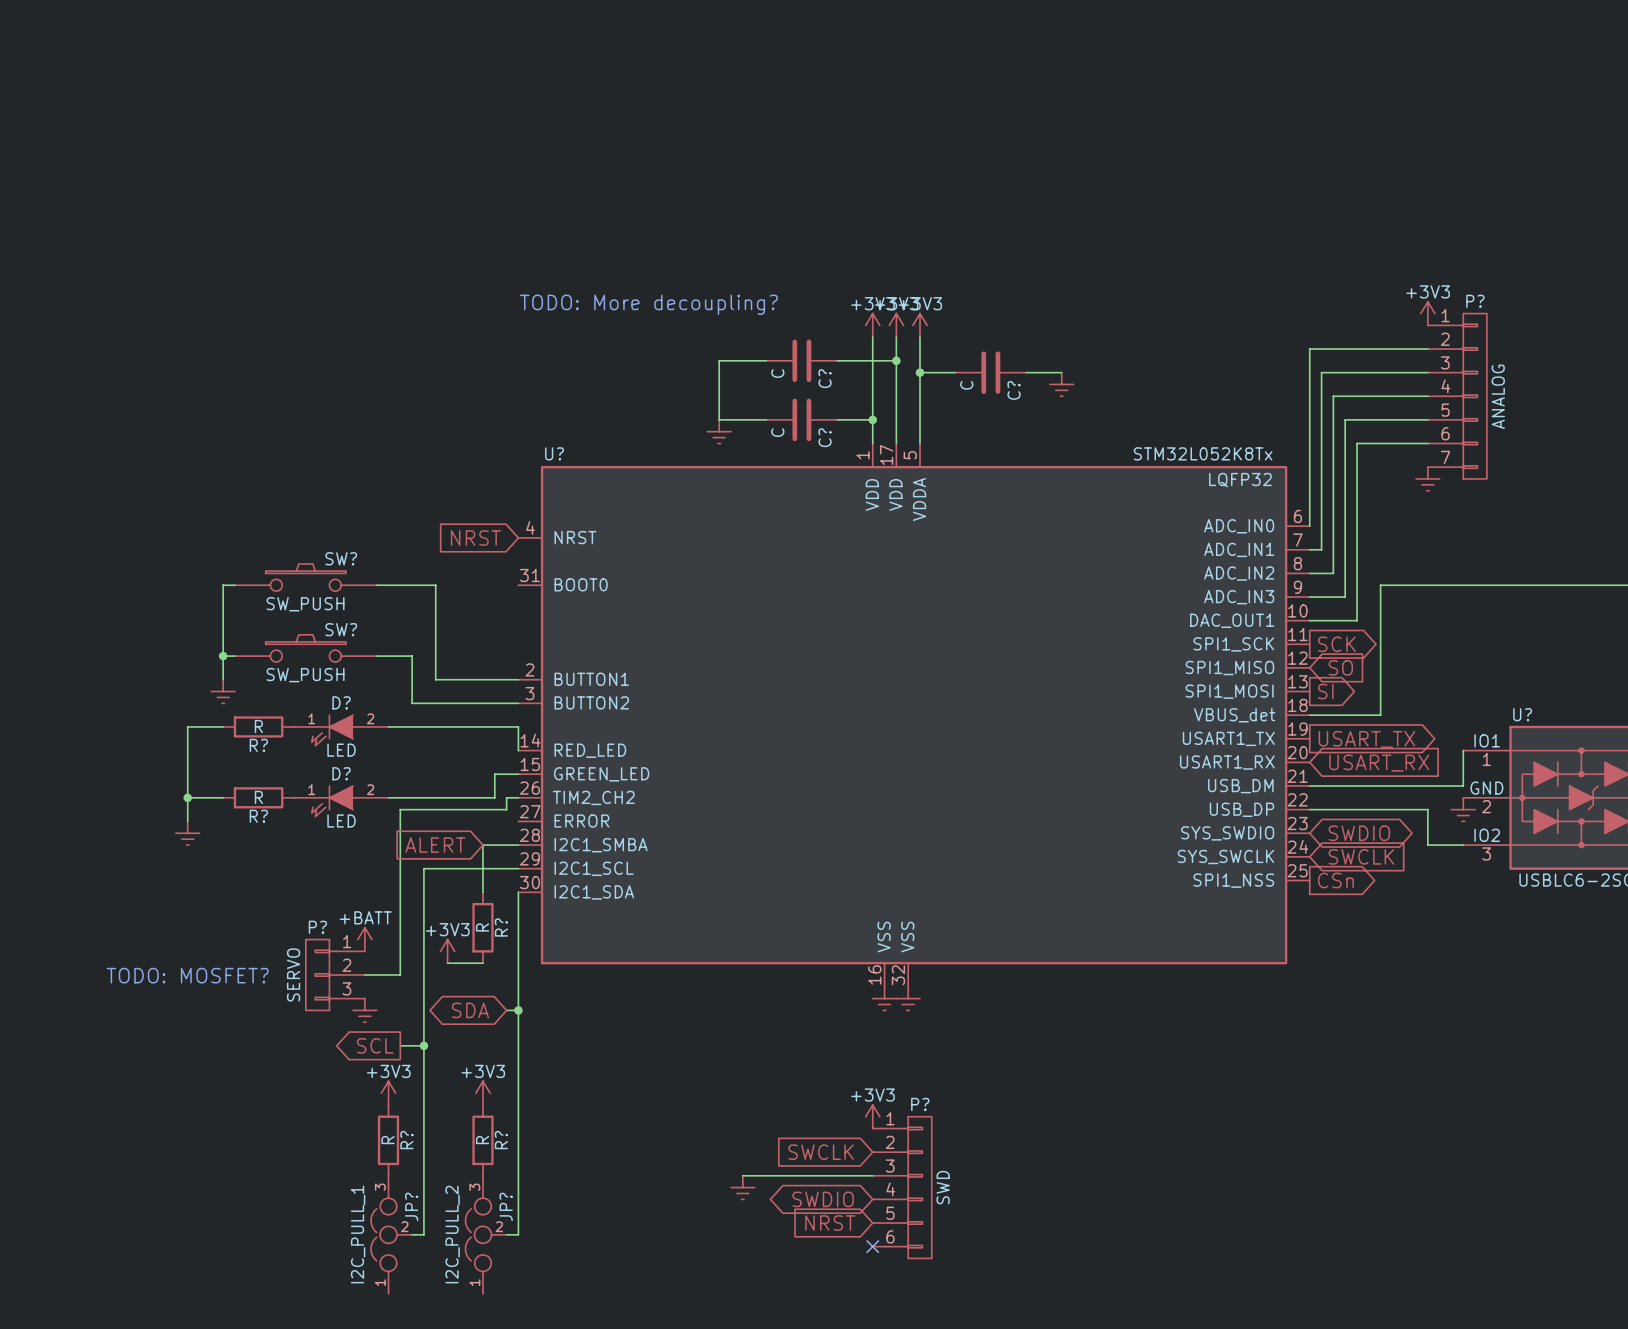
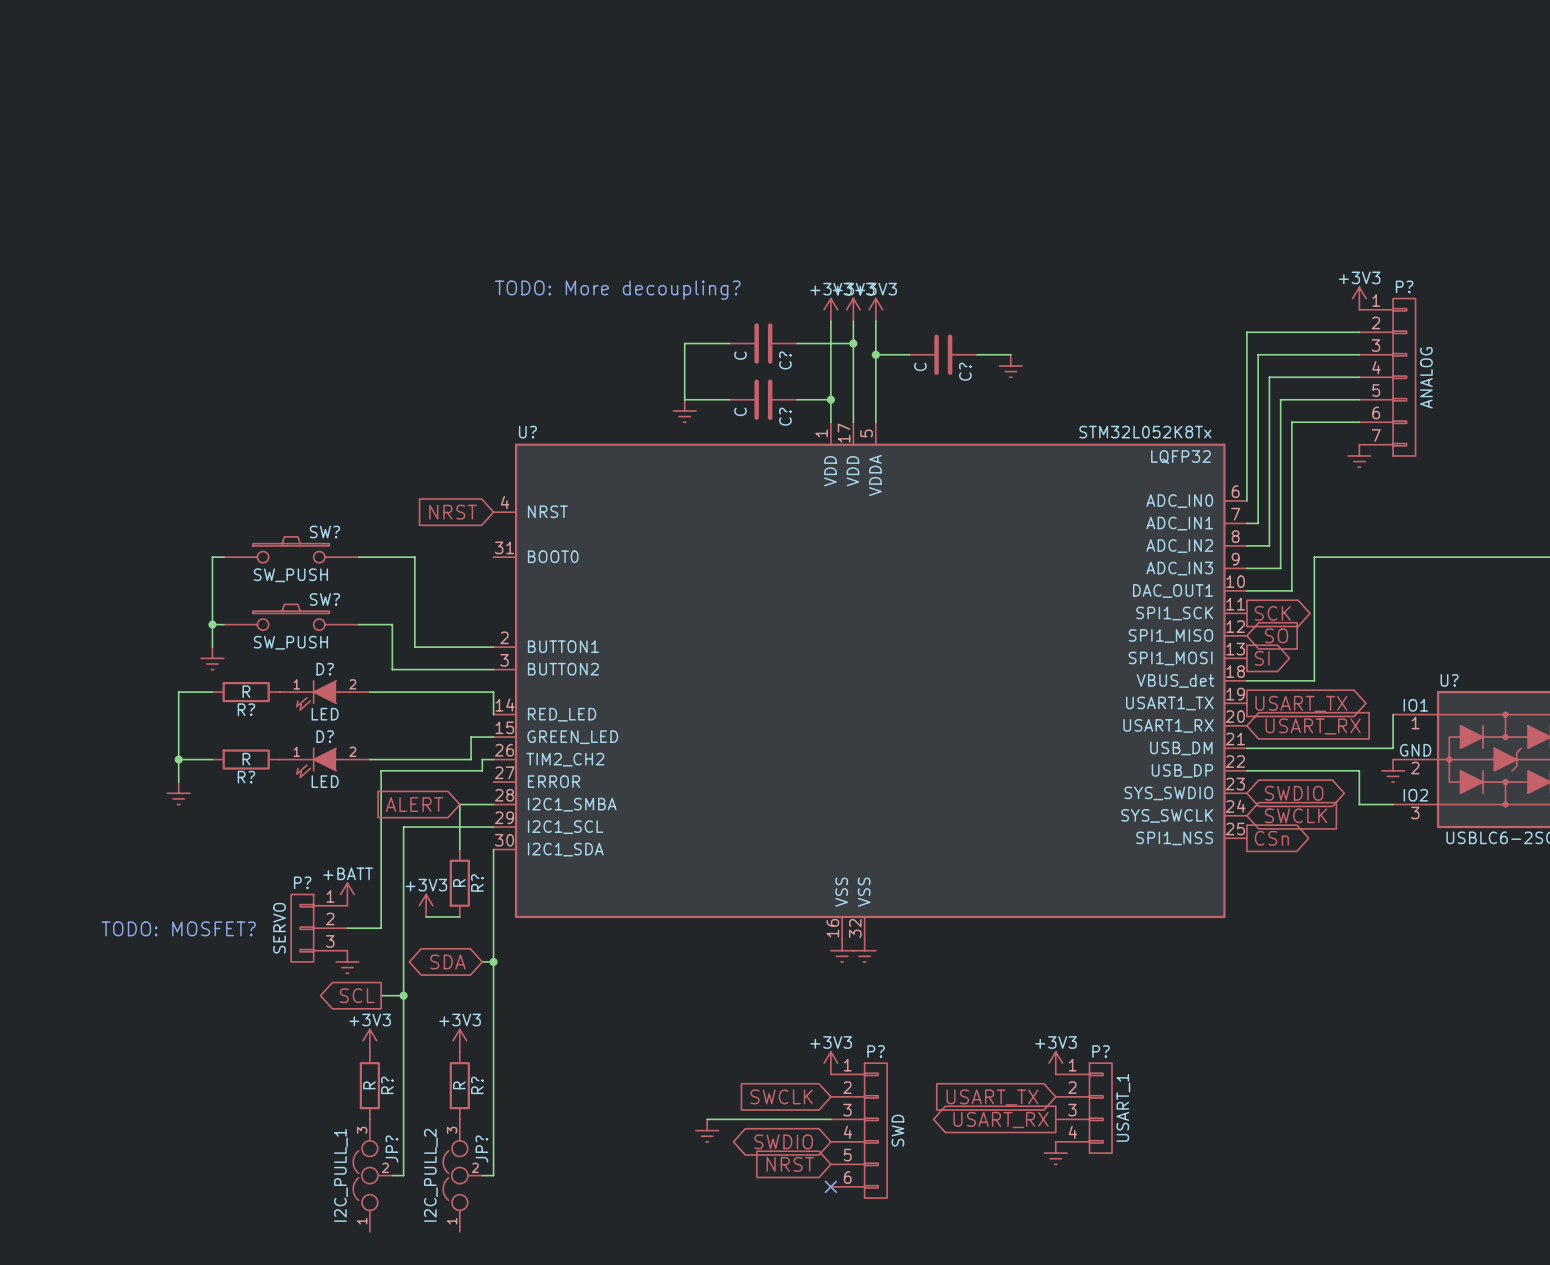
power symbol: none -> +3V3 (1055, 1063)
global label: none -> USART_TX (992, 1097)
P?: none -> USART_1 (1083, 1108)
global label: none -> USART_RX (1000, 1120)
power symbol: none -> (1055, 1153)

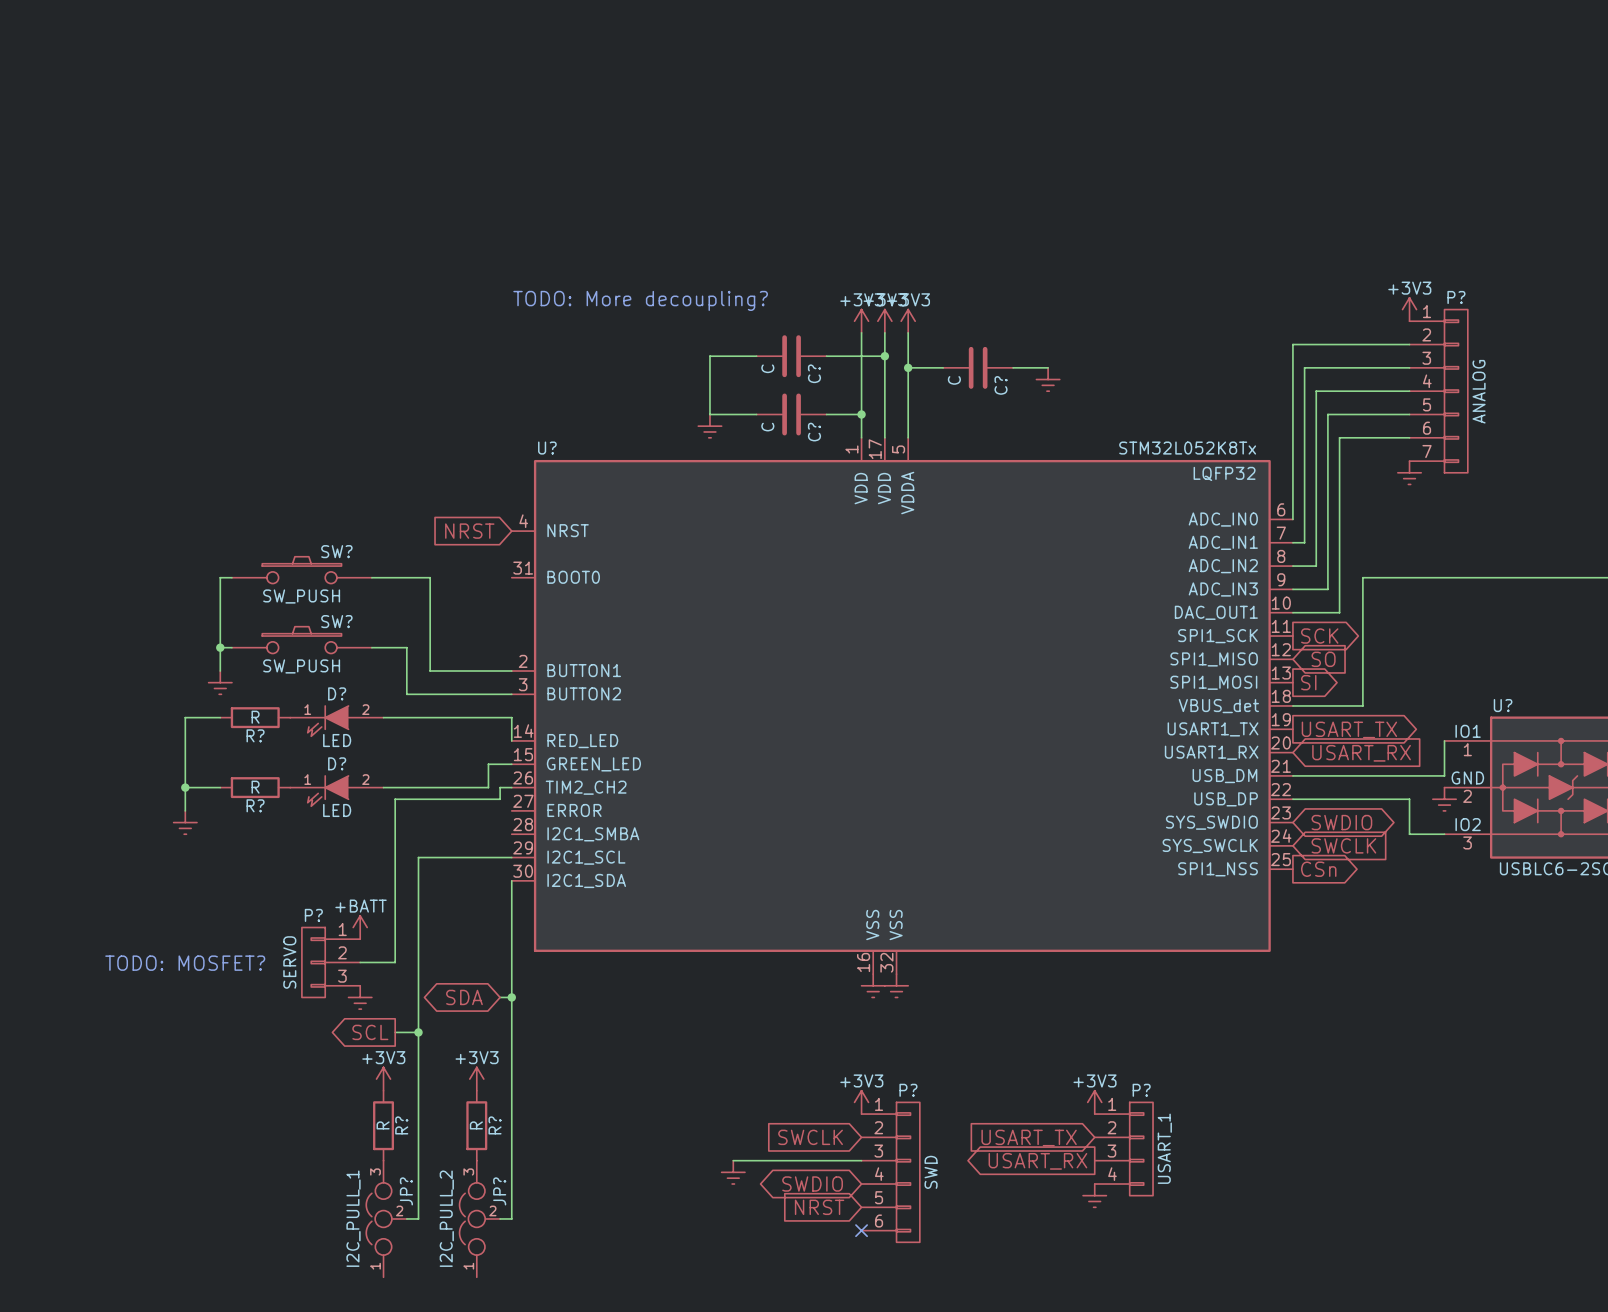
global label: ALERT (414, 804) -> none
wire: (493, 804) (459, 804) (459, 849) -> none
R?: R (459, 883) -> none
power symbol: +3V3 (426, 905) -> none
wire: (426, 916) (459, 916) -> none

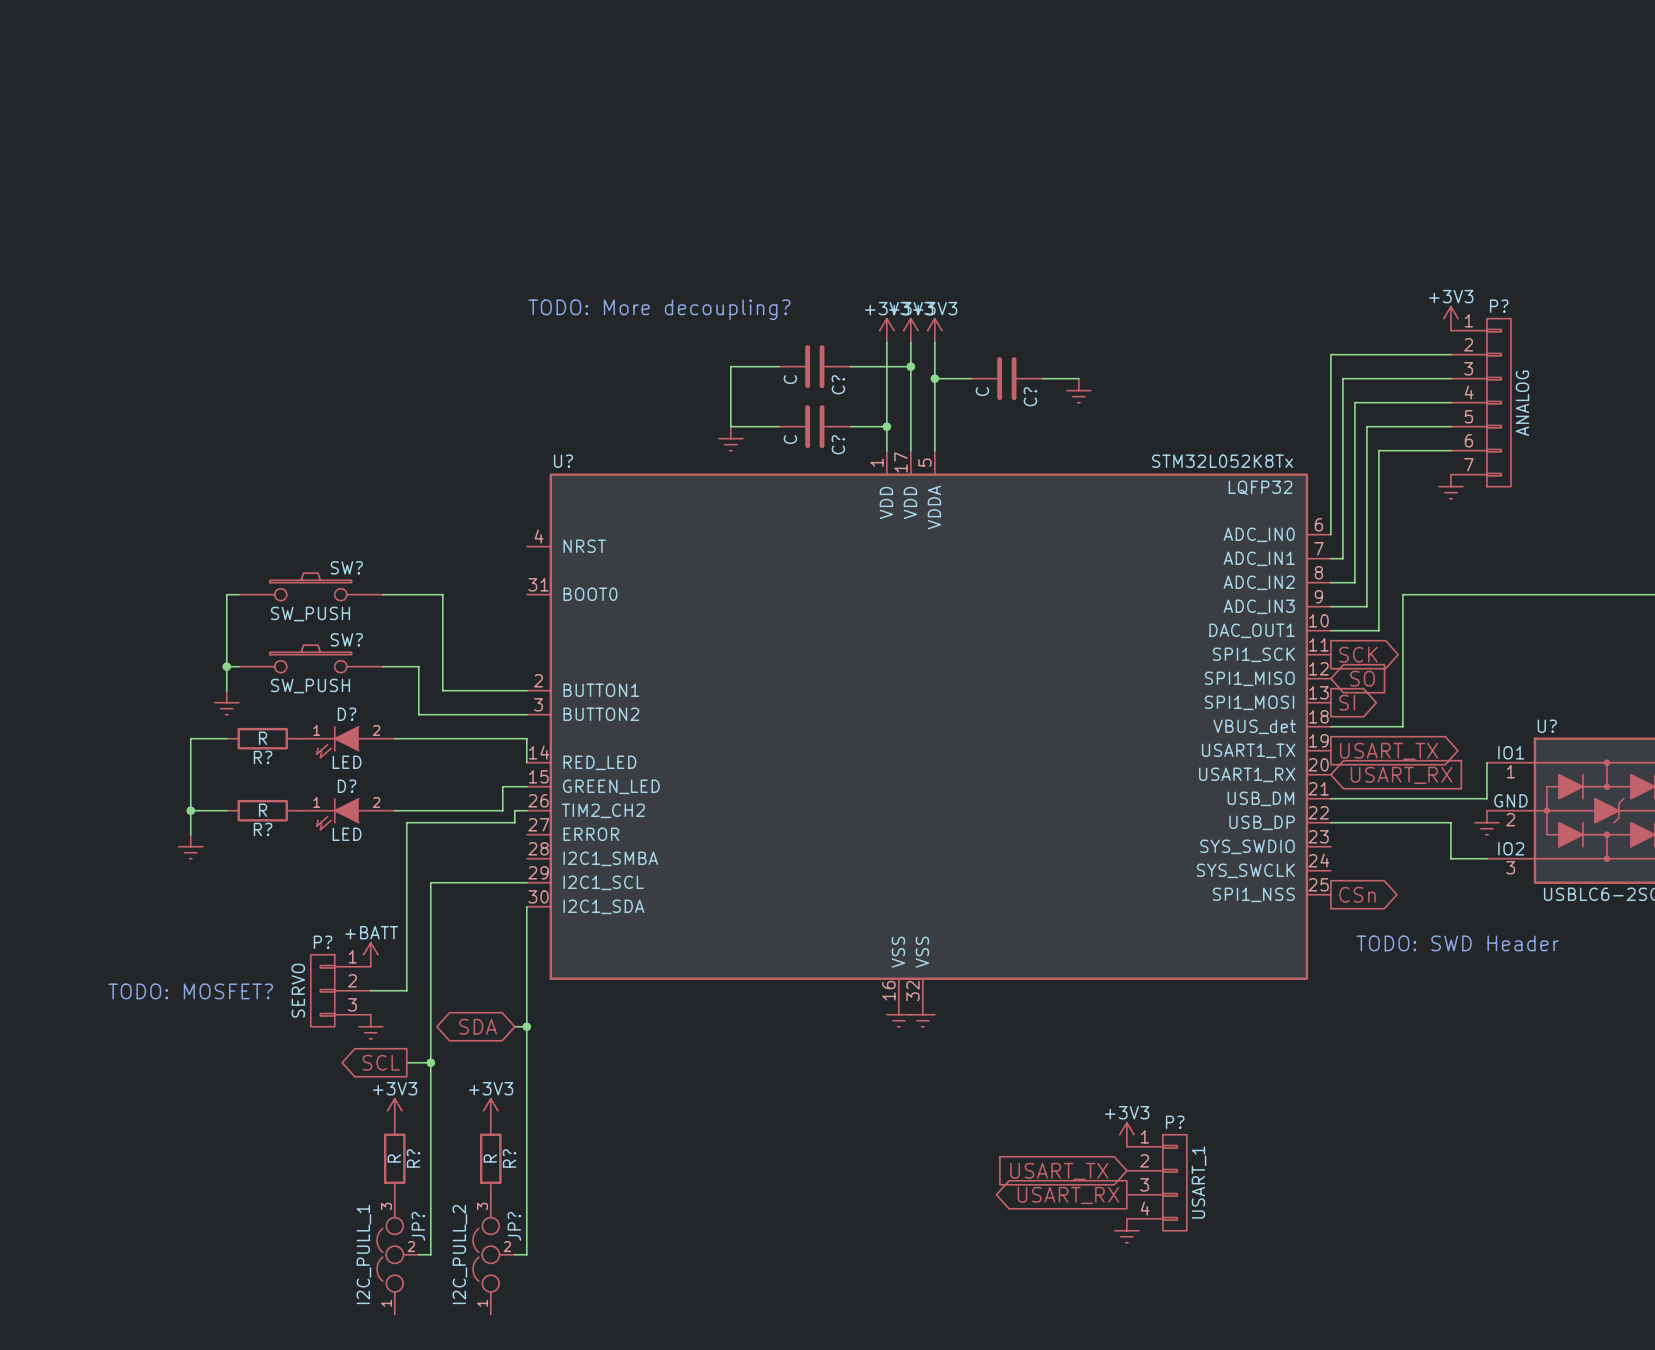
global label: NRST (469, 531) -> none
global label: SWDIO (1341, 822) -> none
global label: SWCLK (1343, 845) -> none
text: none -> TODO: SWD Header (1457, 943)
power symbol: +3V3 (861, 1102) -> none
global label: SWCLK (810, 1137) -> none
wire: (733, 1160) (861, 1160) -> none
power symbol: (733, 1172) -> none
P?: SWD (890, 1172) -> none
global label: SWDIO (812, 1184) -> none
global label: NRST (819, 1207) -> none
no-connect mark: (861, 1230) -> none

